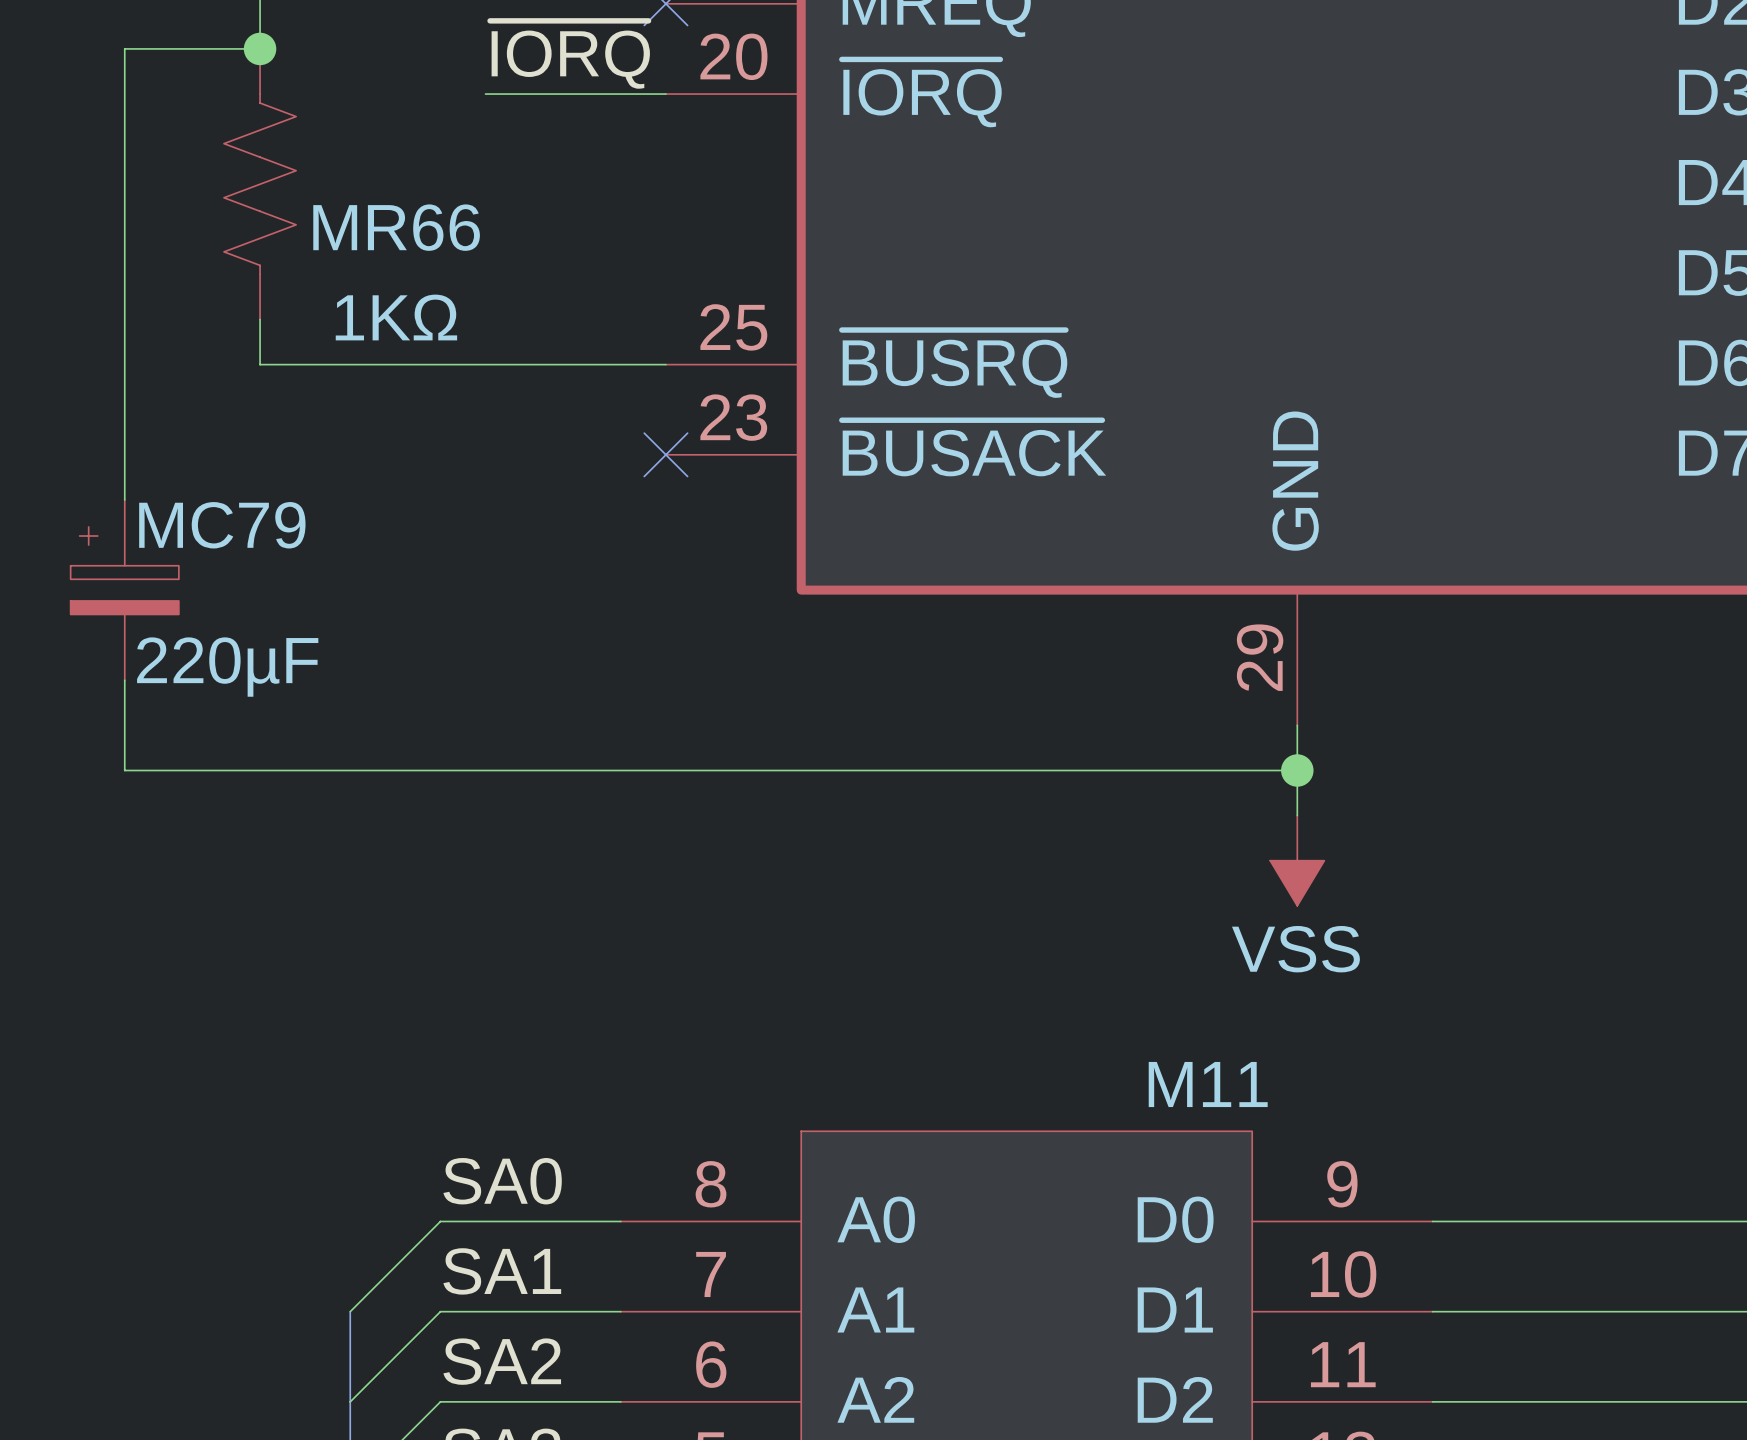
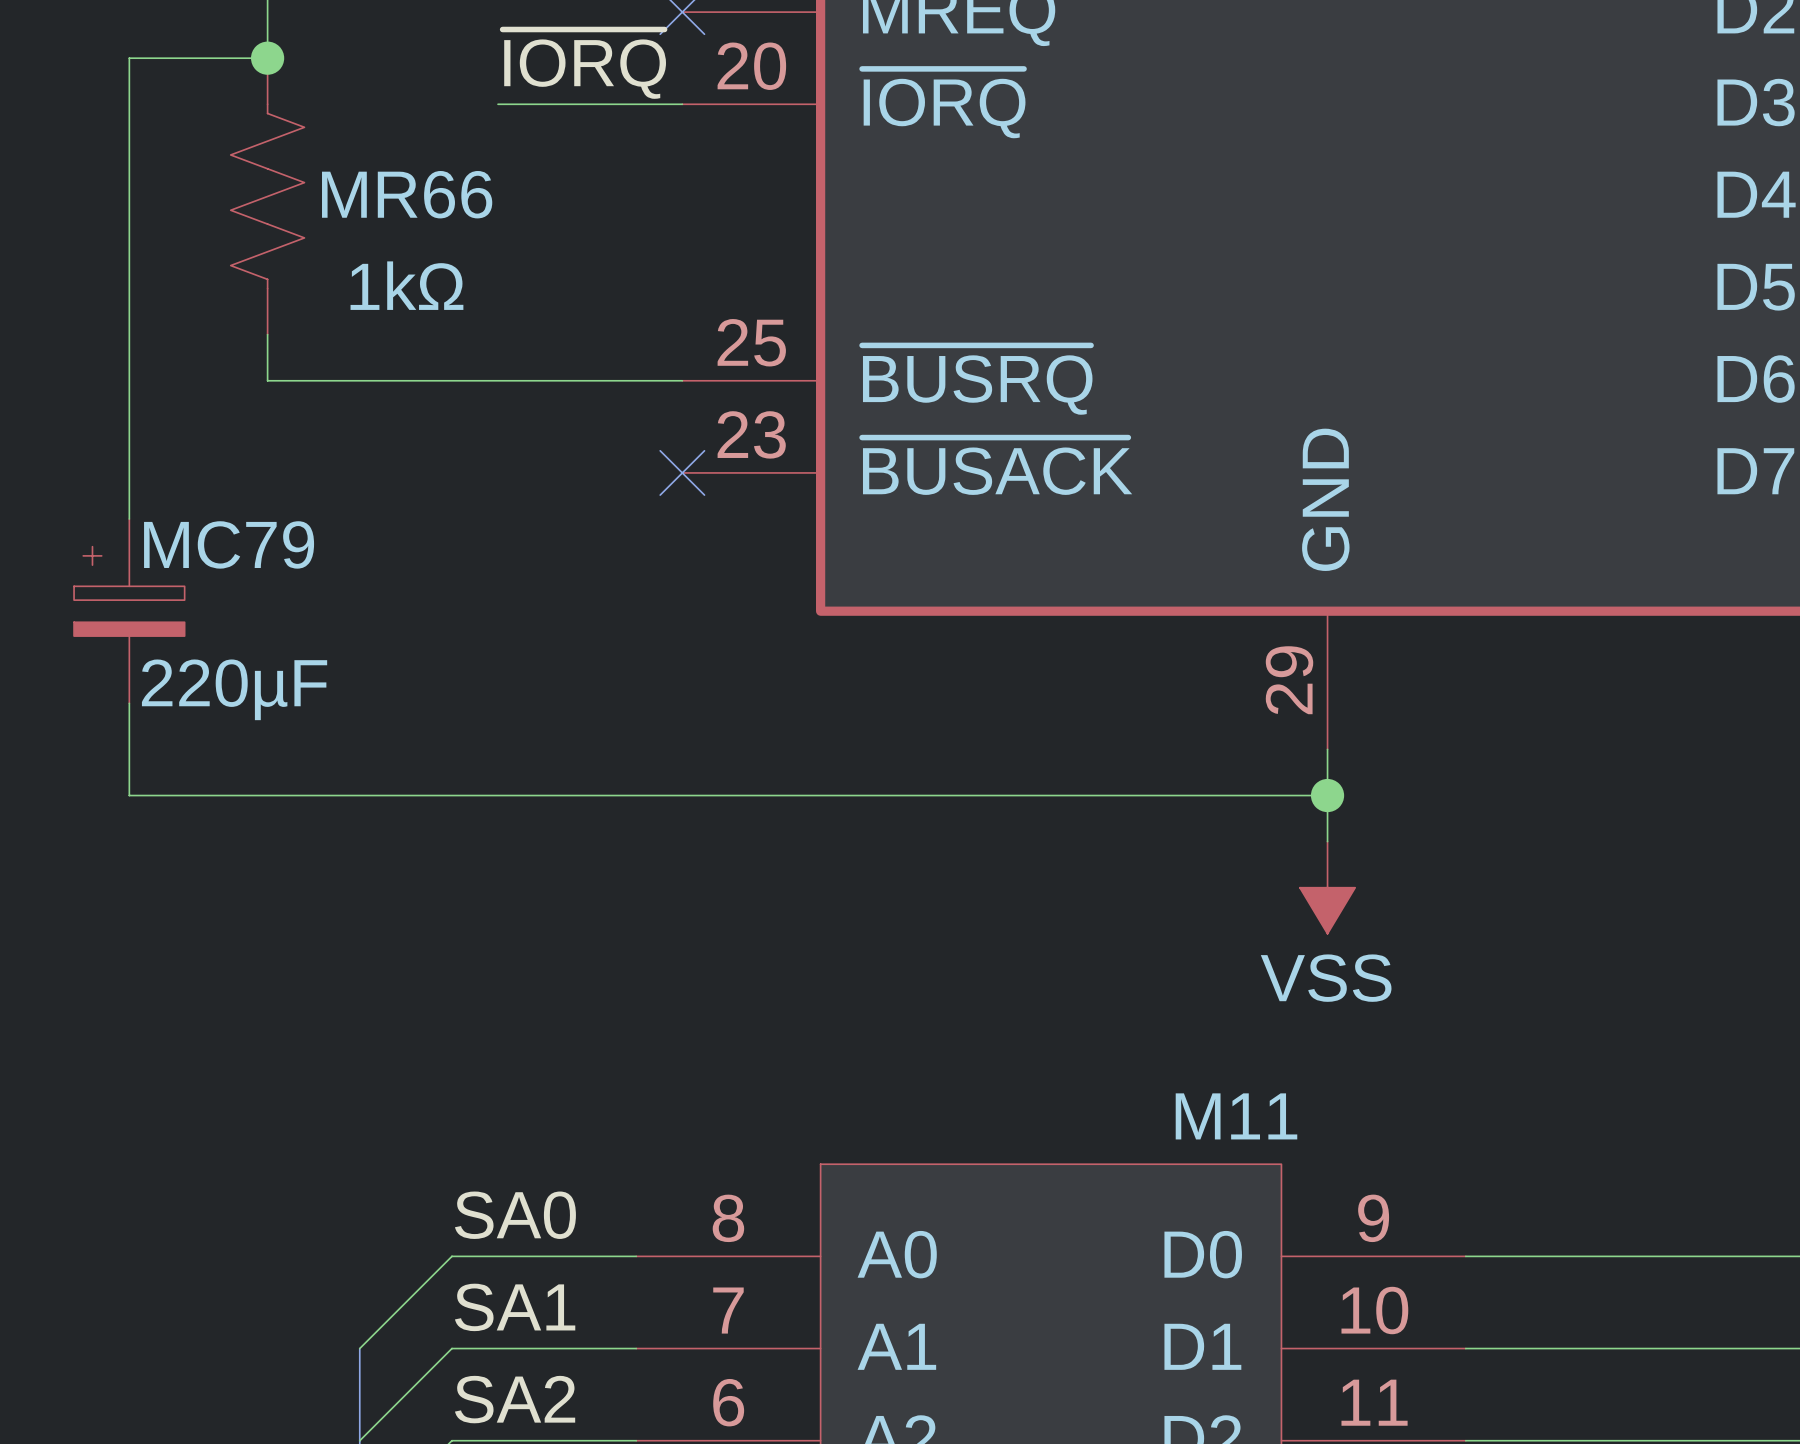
MR66 name position: MR66 (396, 227) -> MR66 (407, 194)
MR66 value: 1KΩ (396, 317) -> 1kΩ (406, 285)

